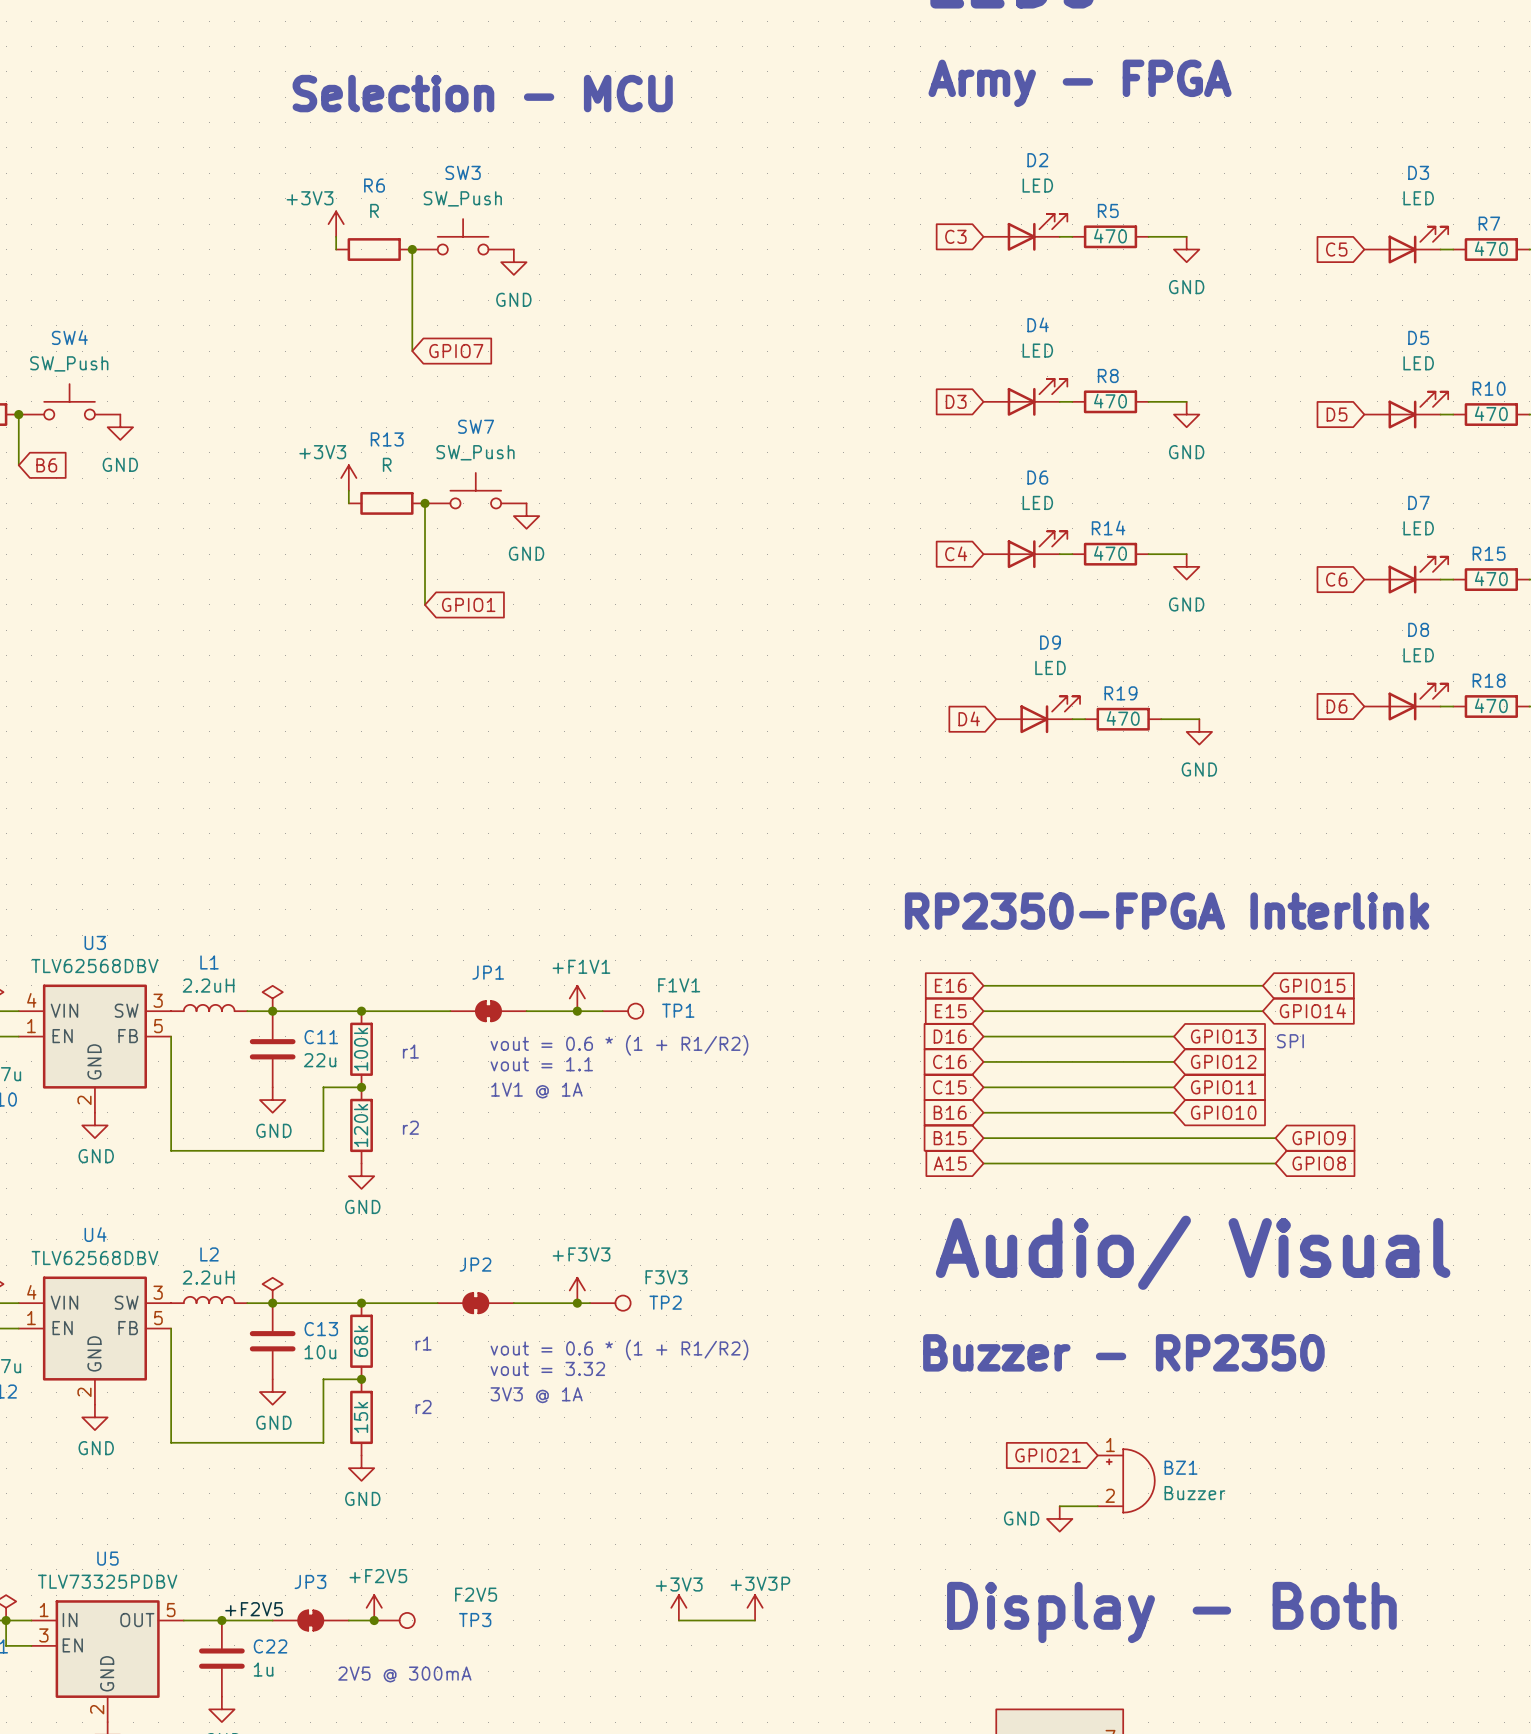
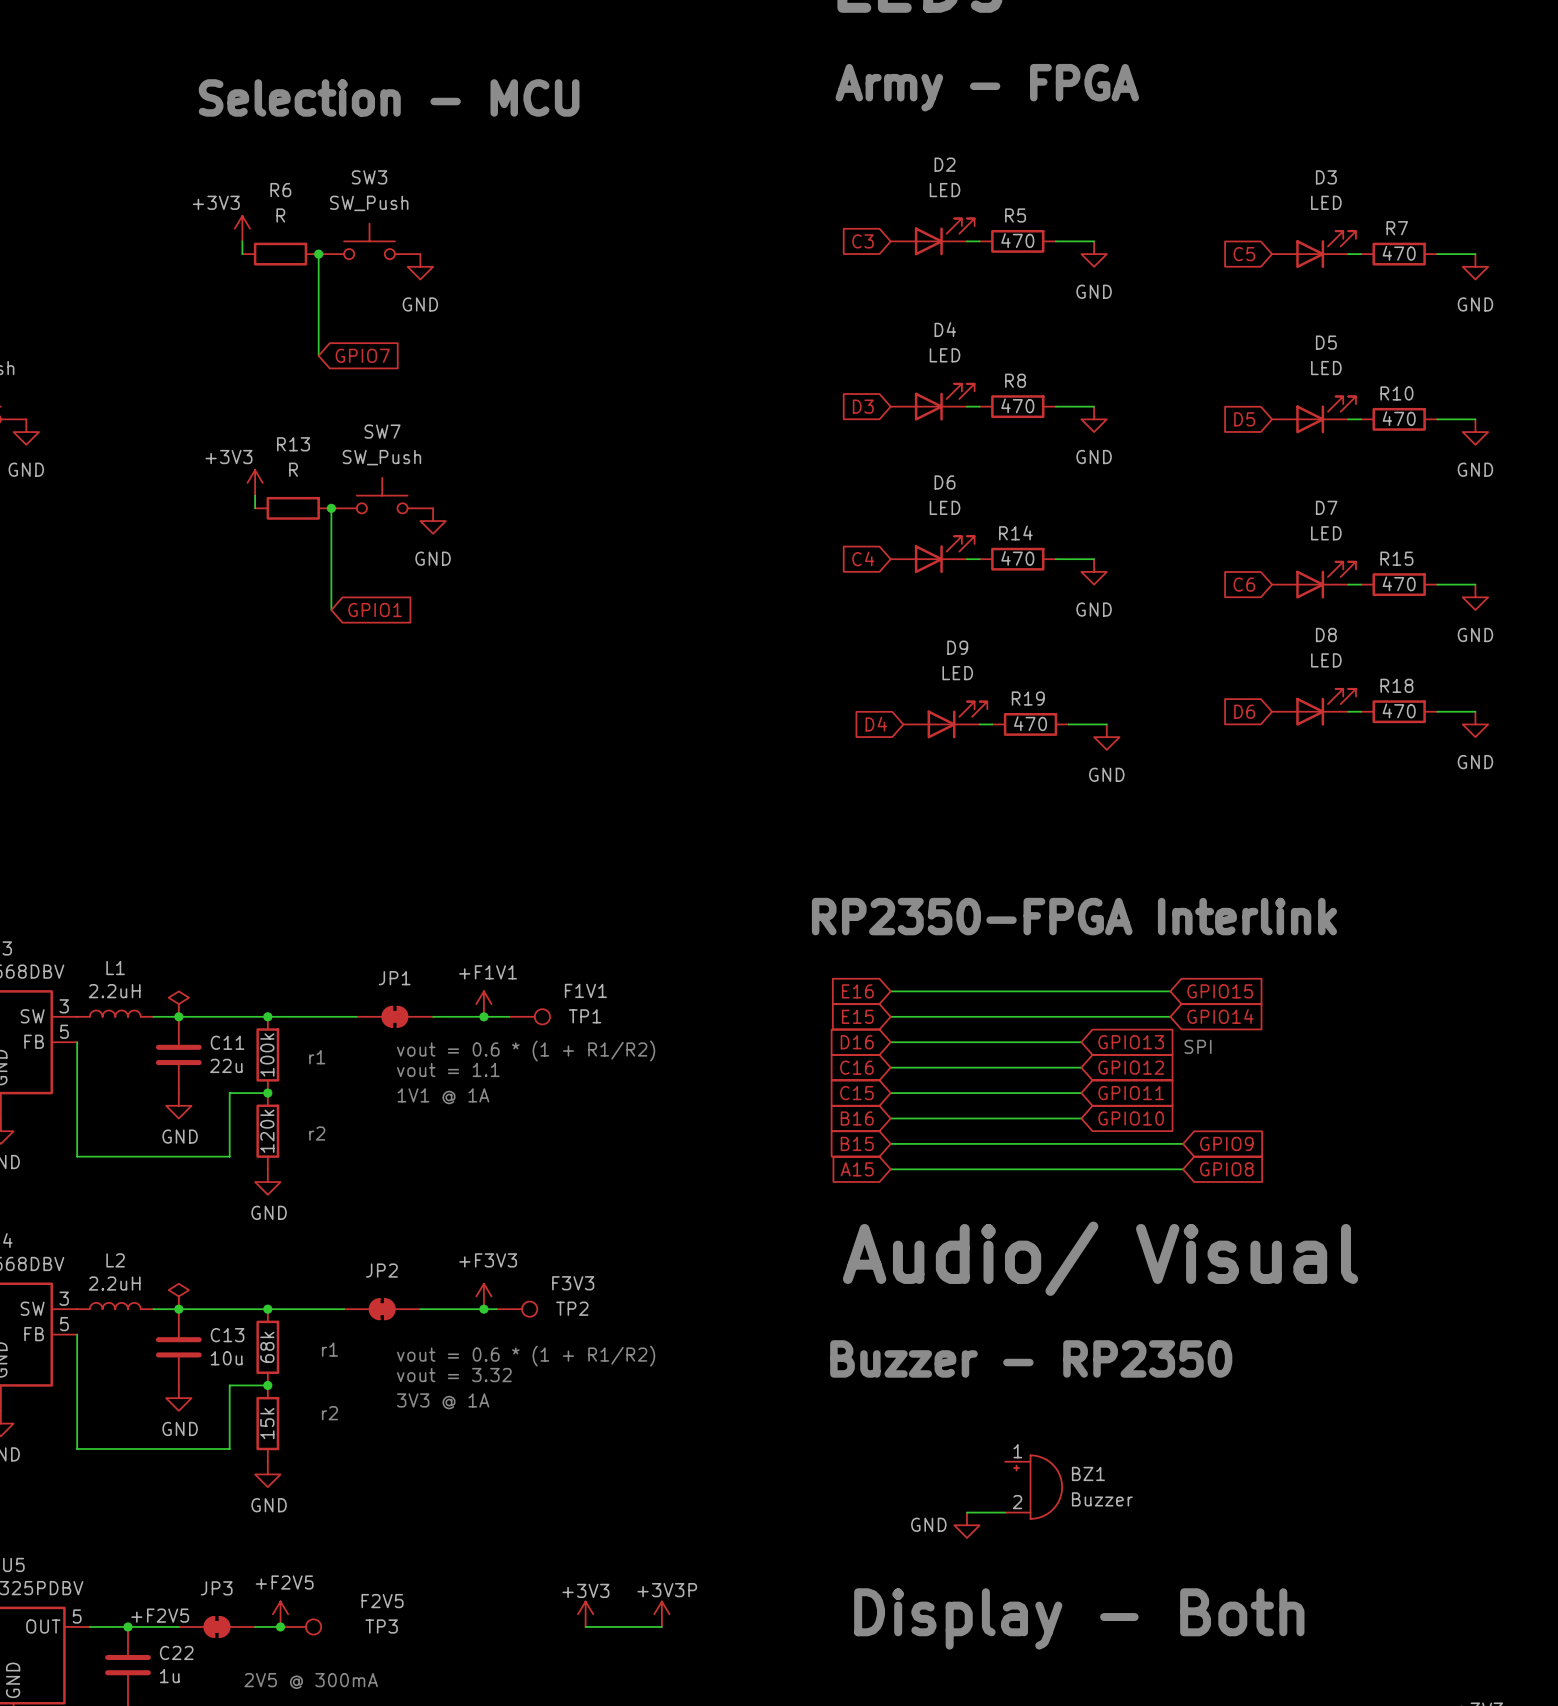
global label: GPIO21 (1048, 1455) -> none

